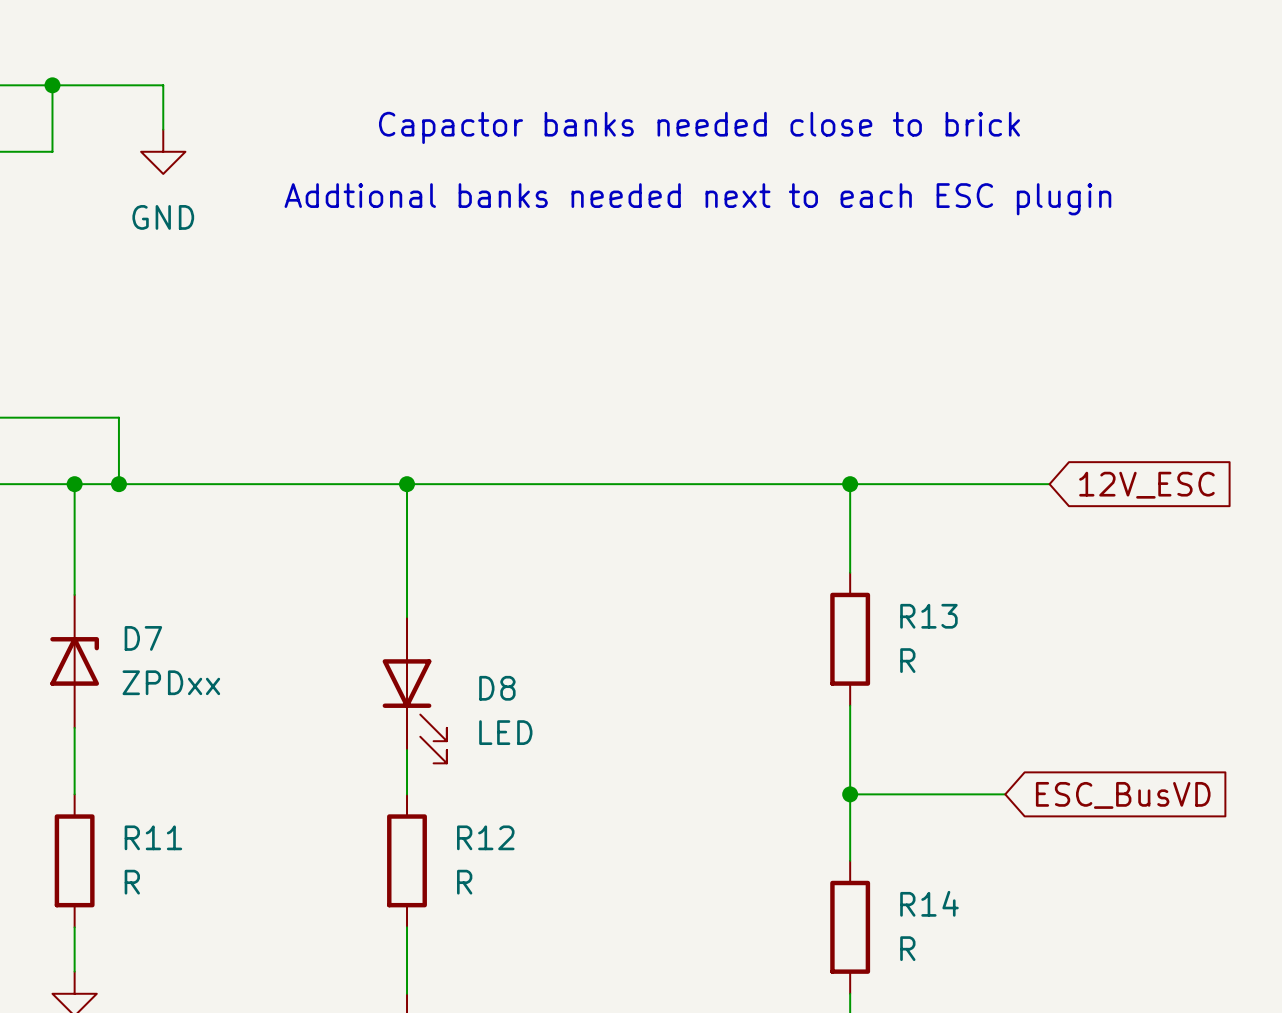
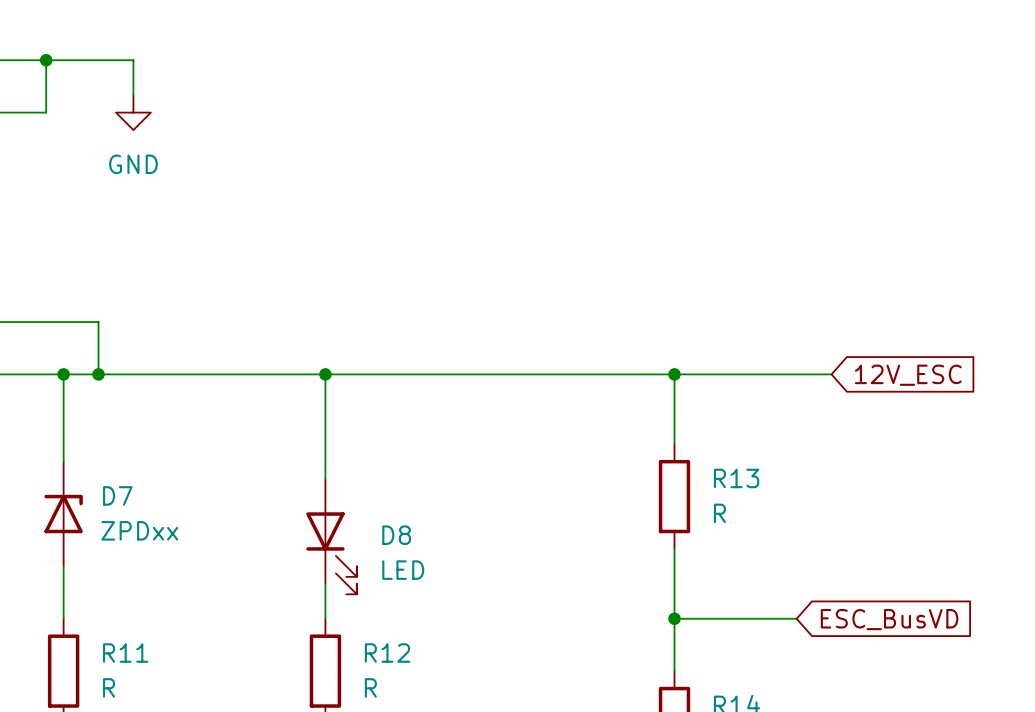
text: Capactor banks needed close to brick (699, 127) -> none
text: Addtional banks needed next to each ESC plugin (697, 199) -> none

